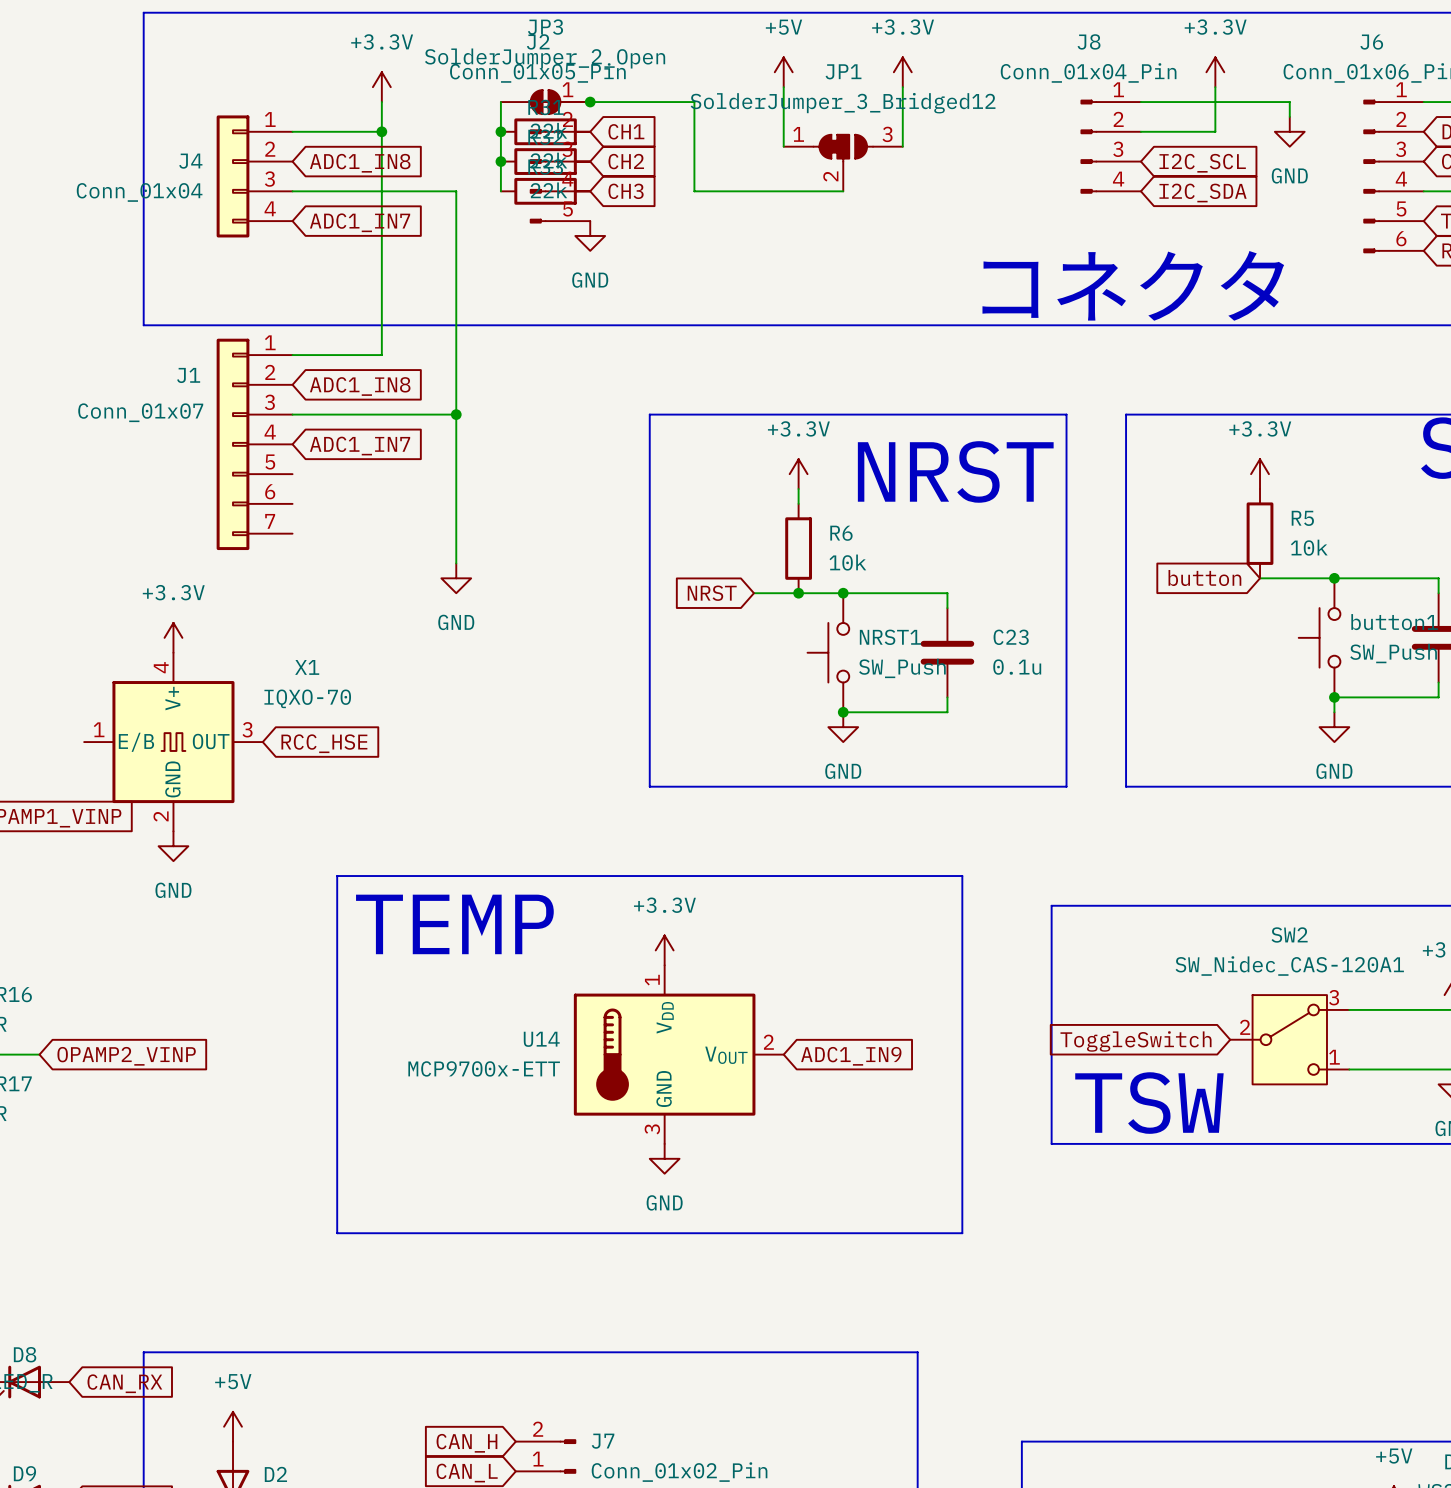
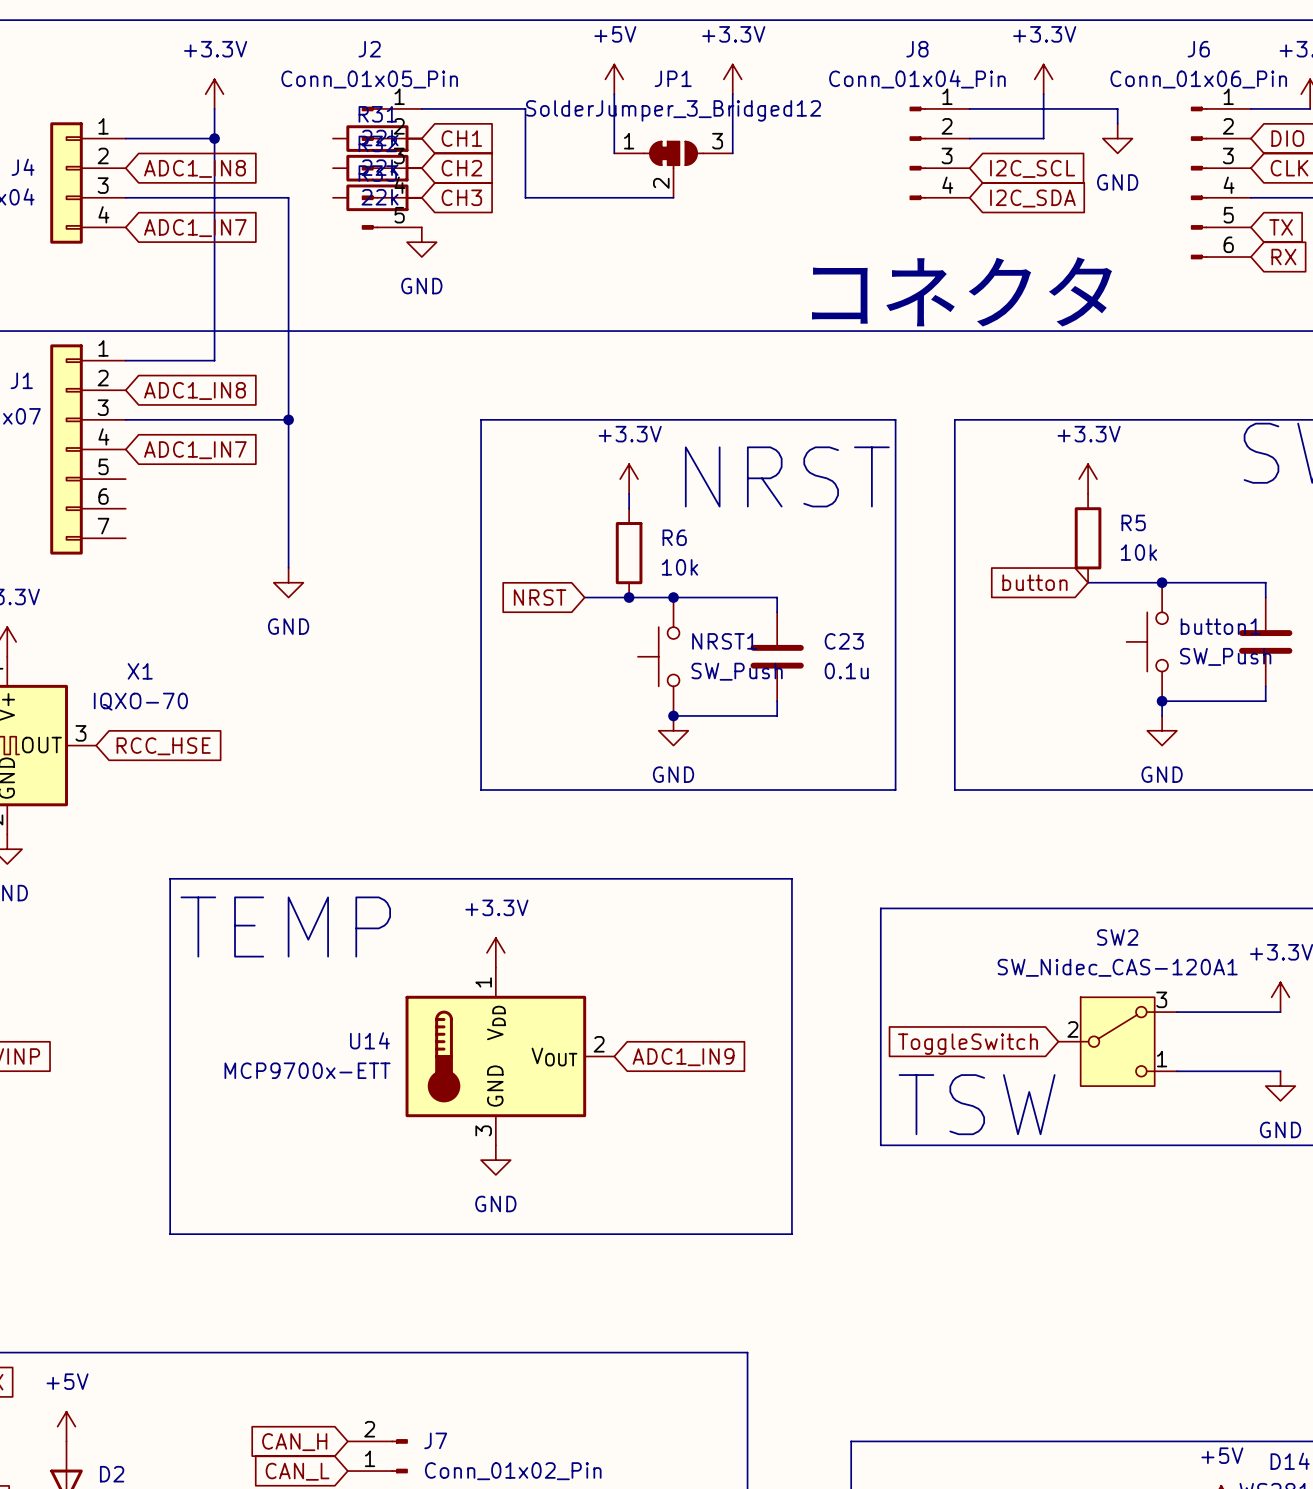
wire: (500, 102) (500, 191) -> none
JP3: SolderJumper_2_Open (545, 102) -> none
junction: (590, 102) -> none
junction: (500, 131) -> none
junction: (500, 161) -> none

